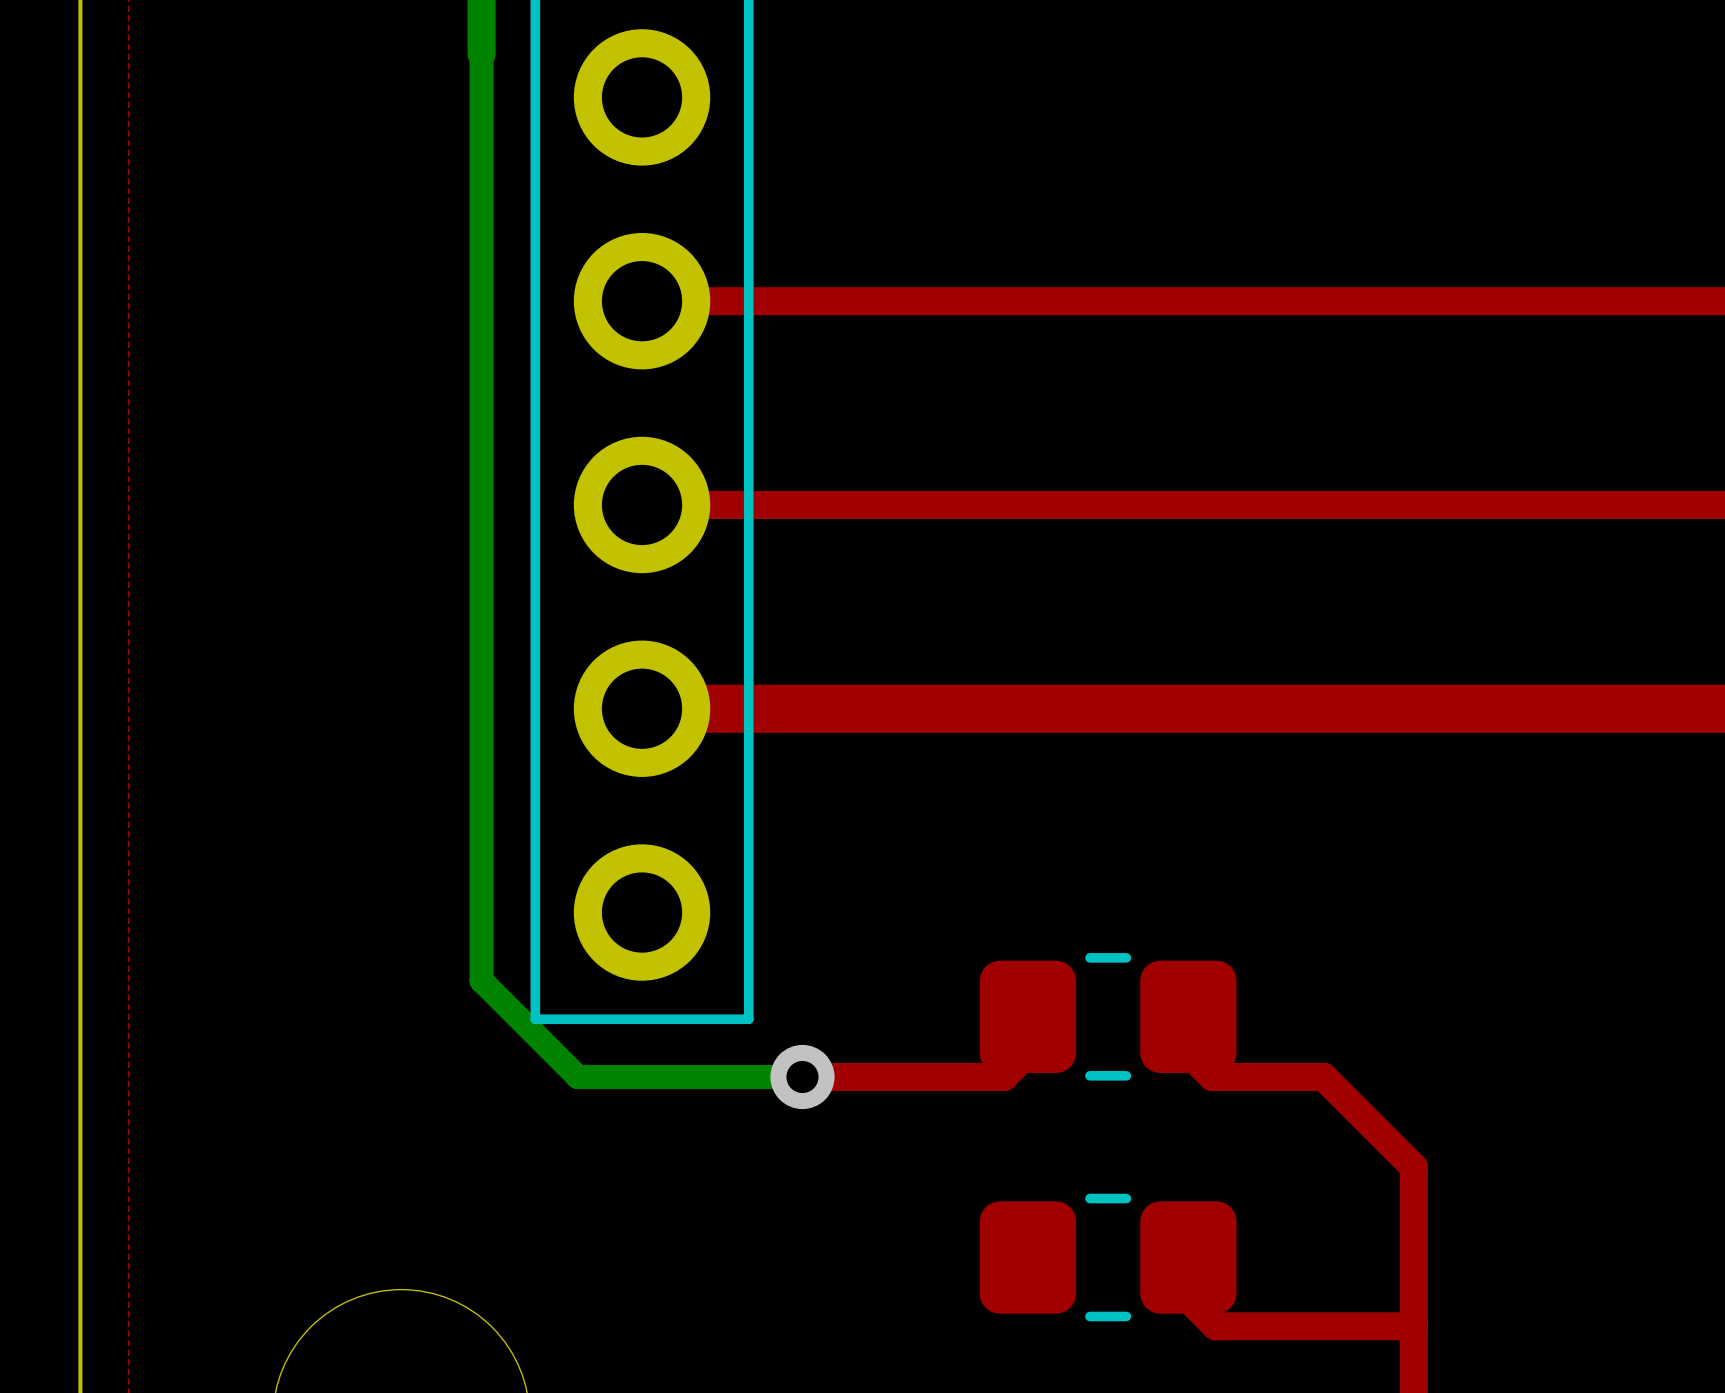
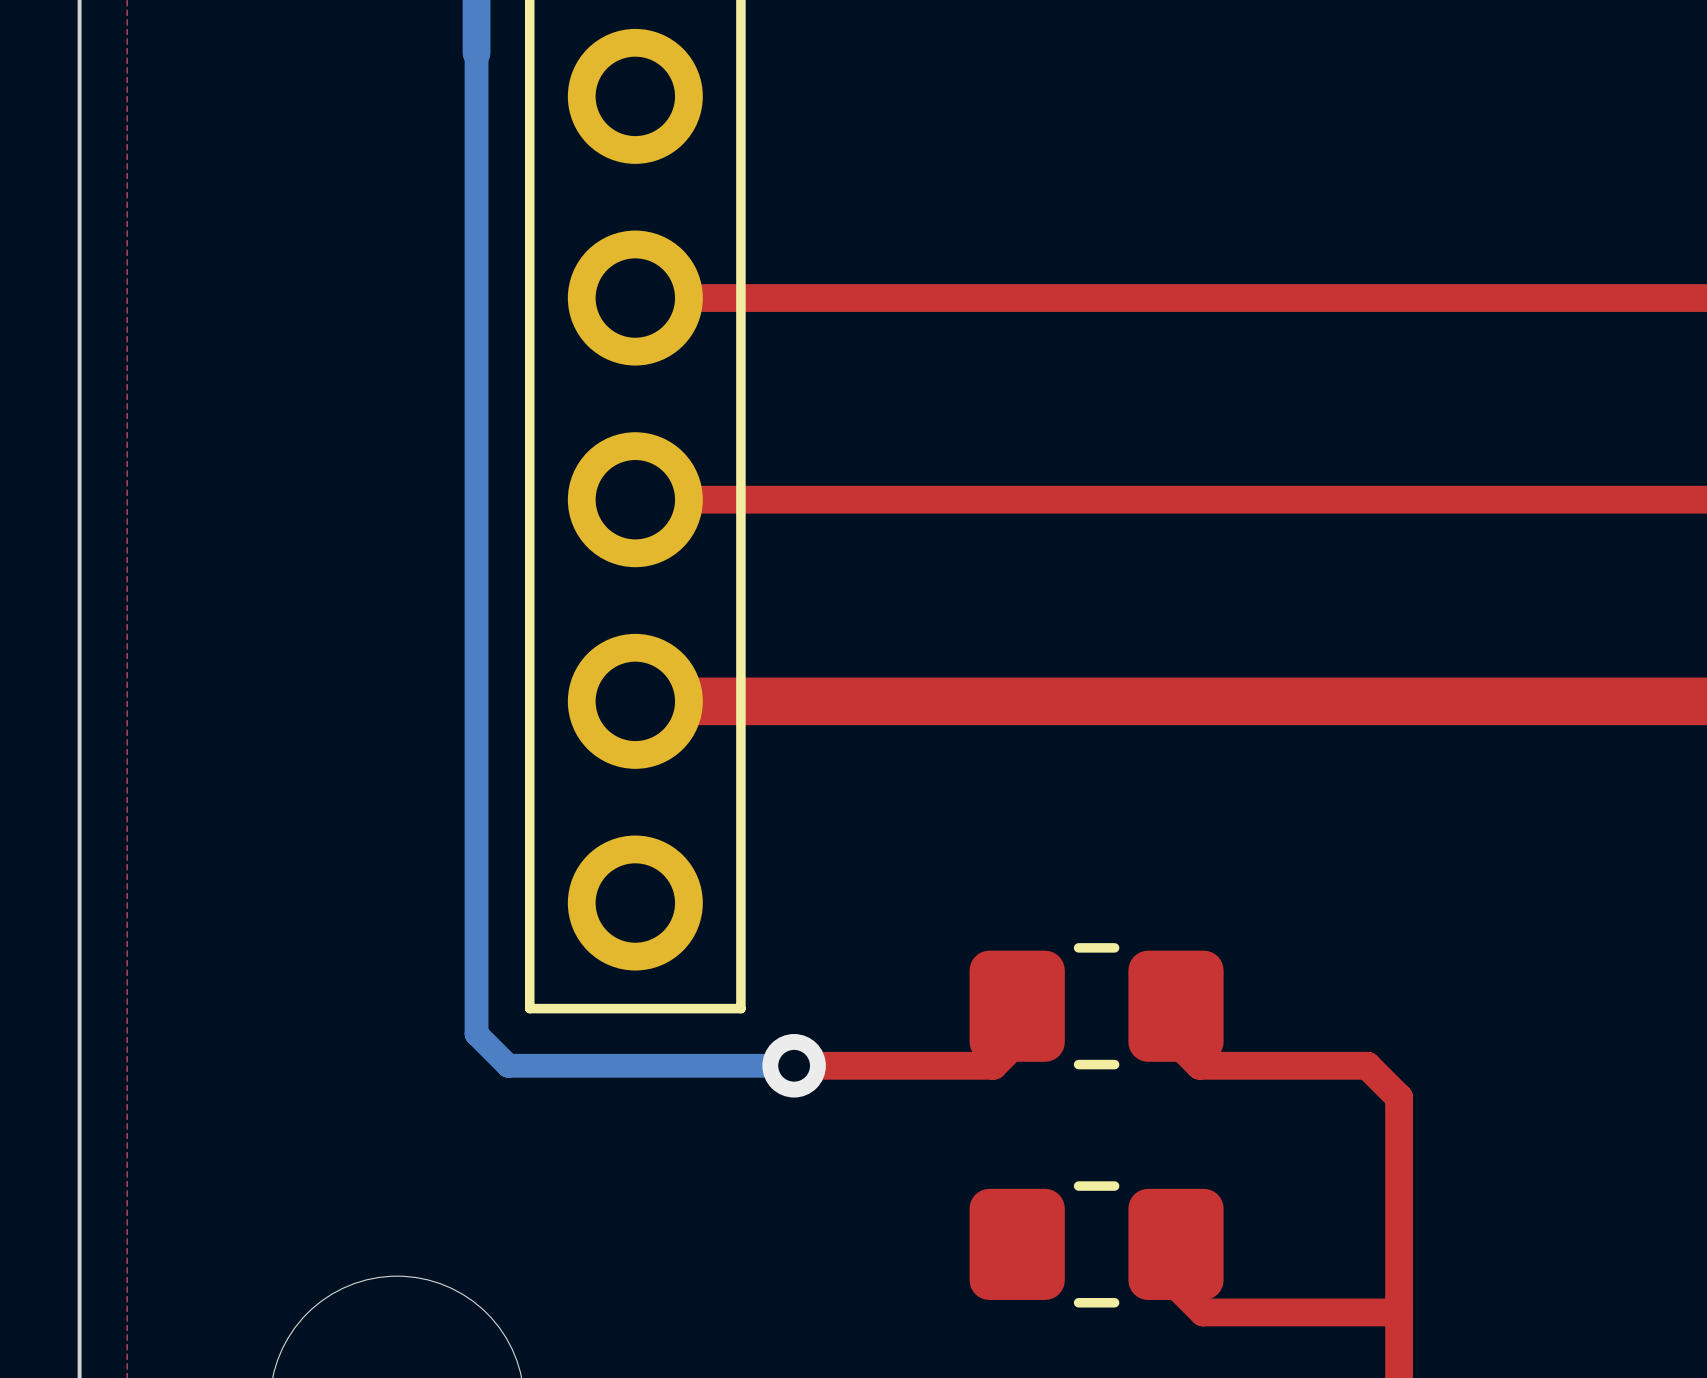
bottom track: (481, 980) (577, 1077) -> (476, 970) (476, 1034) (508, 1065) (571, 1065)
top track: (1323, 1077) (1413, 1167) -> (1309, 1065) (1367, 1065) (1399, 1097) (1399, 1155)

